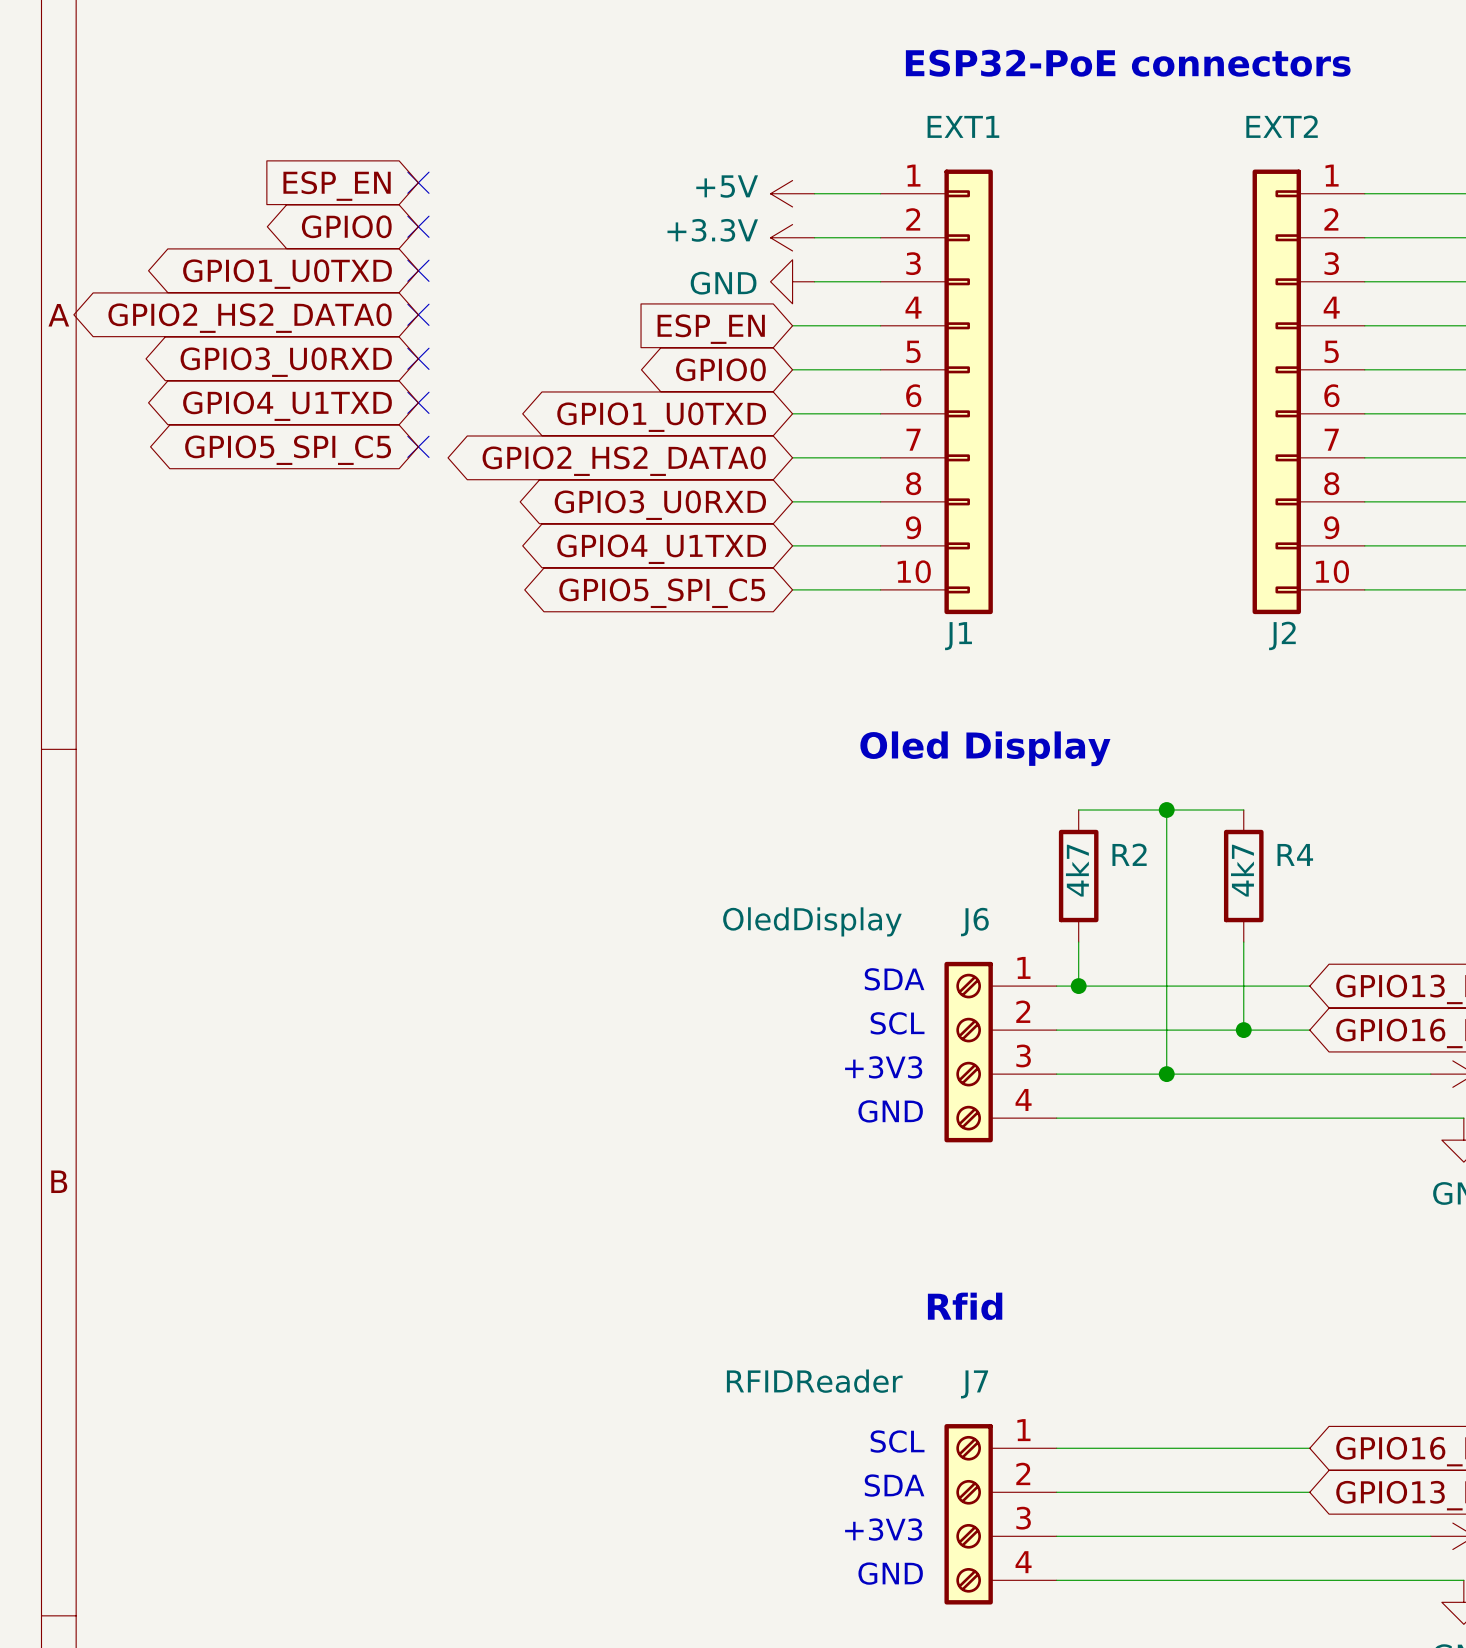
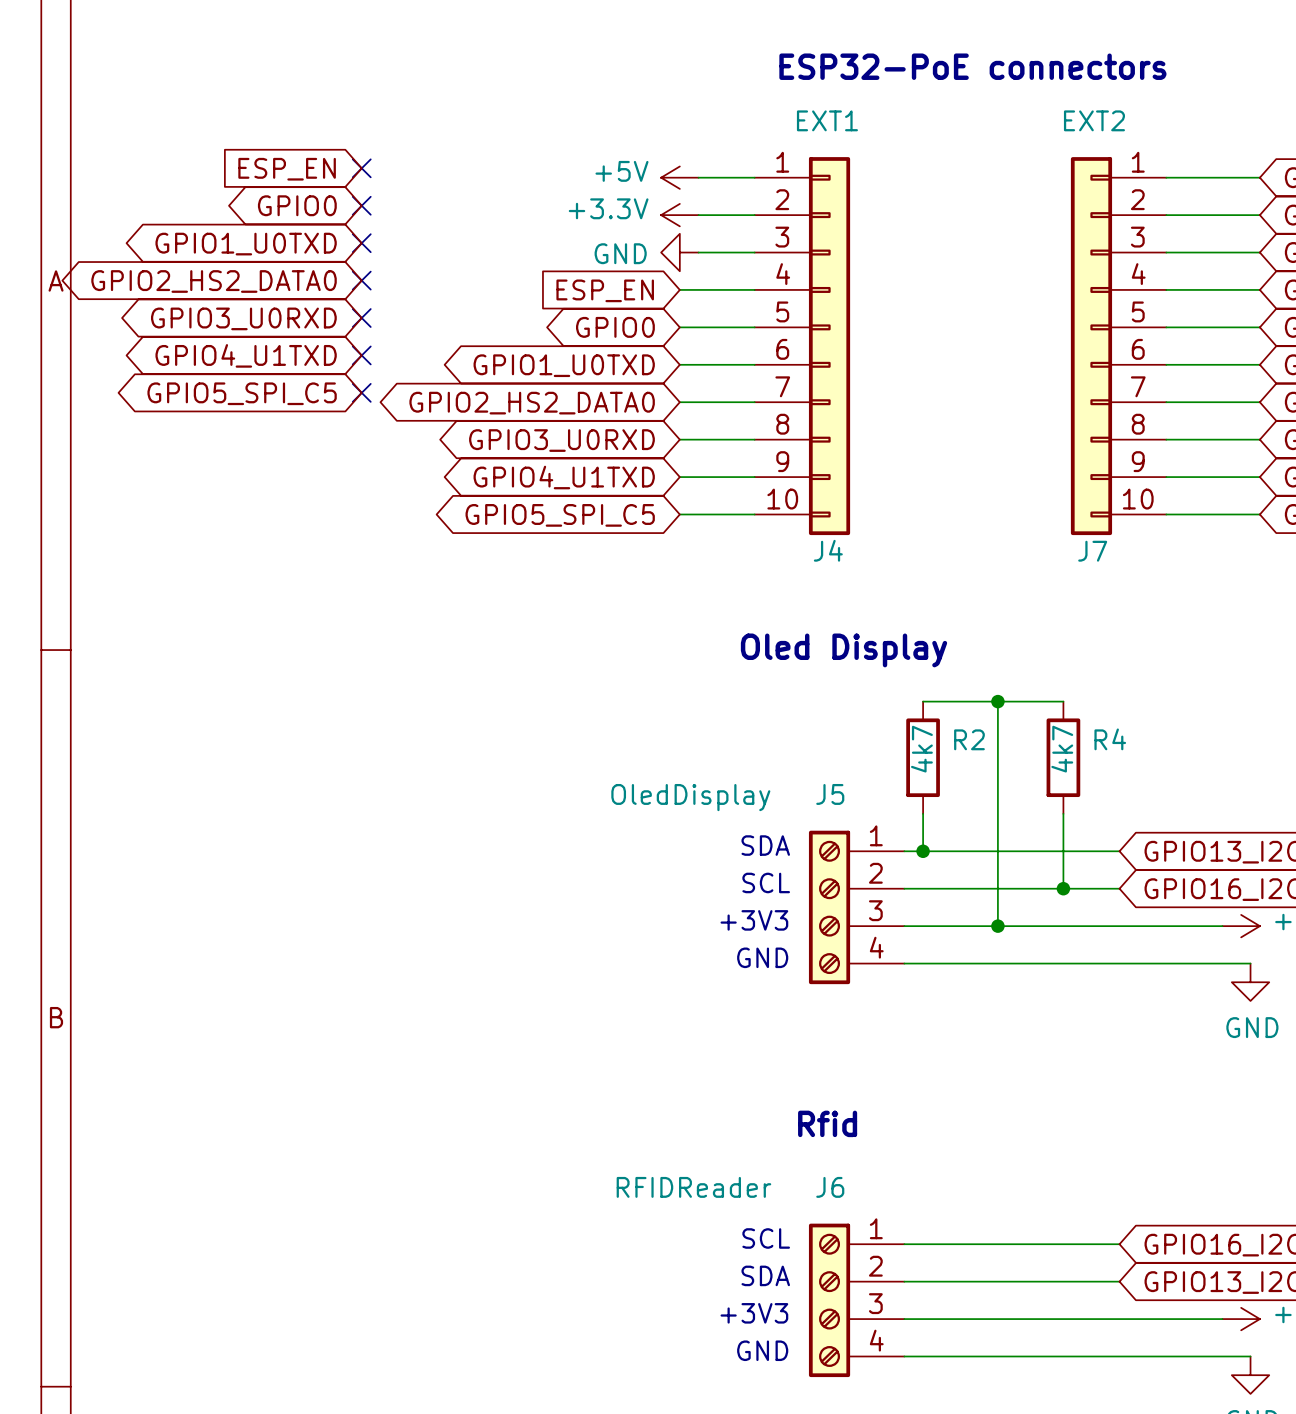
J2 name: J2 (1282, 635) -> J7 (1092, 551)
J1 name: J1 (958, 636) -> J4 (828, 550)
J6 name: J6 (974, 922) -> J5 (830, 794)
J7 name: J7 (974, 1384) -> J6 (830, 1187)

